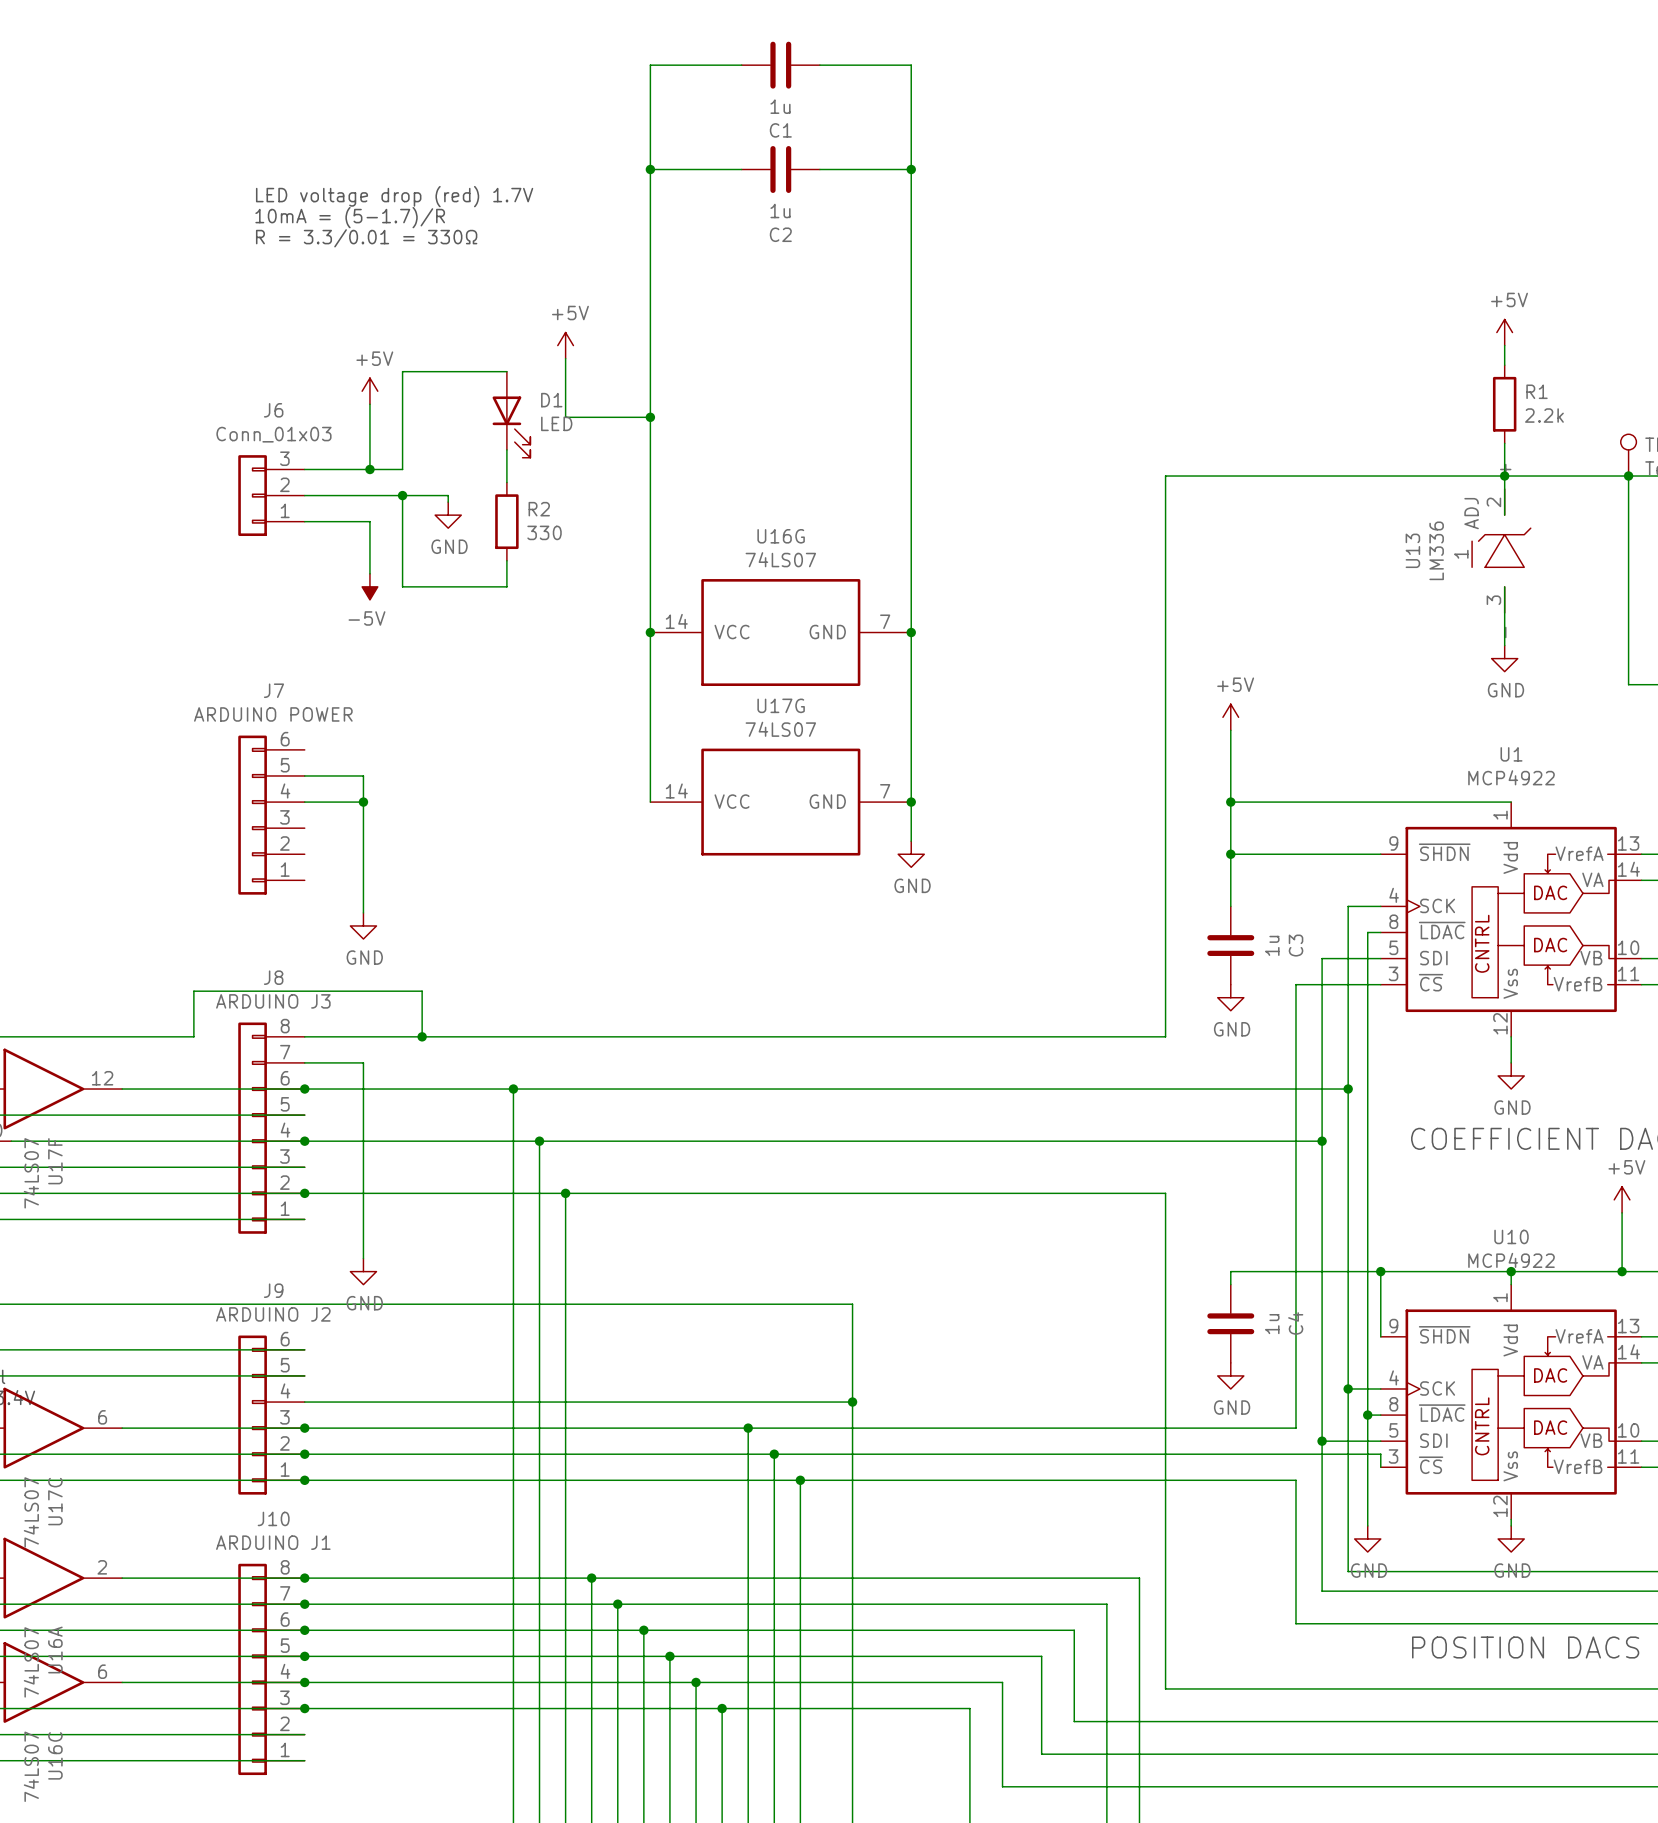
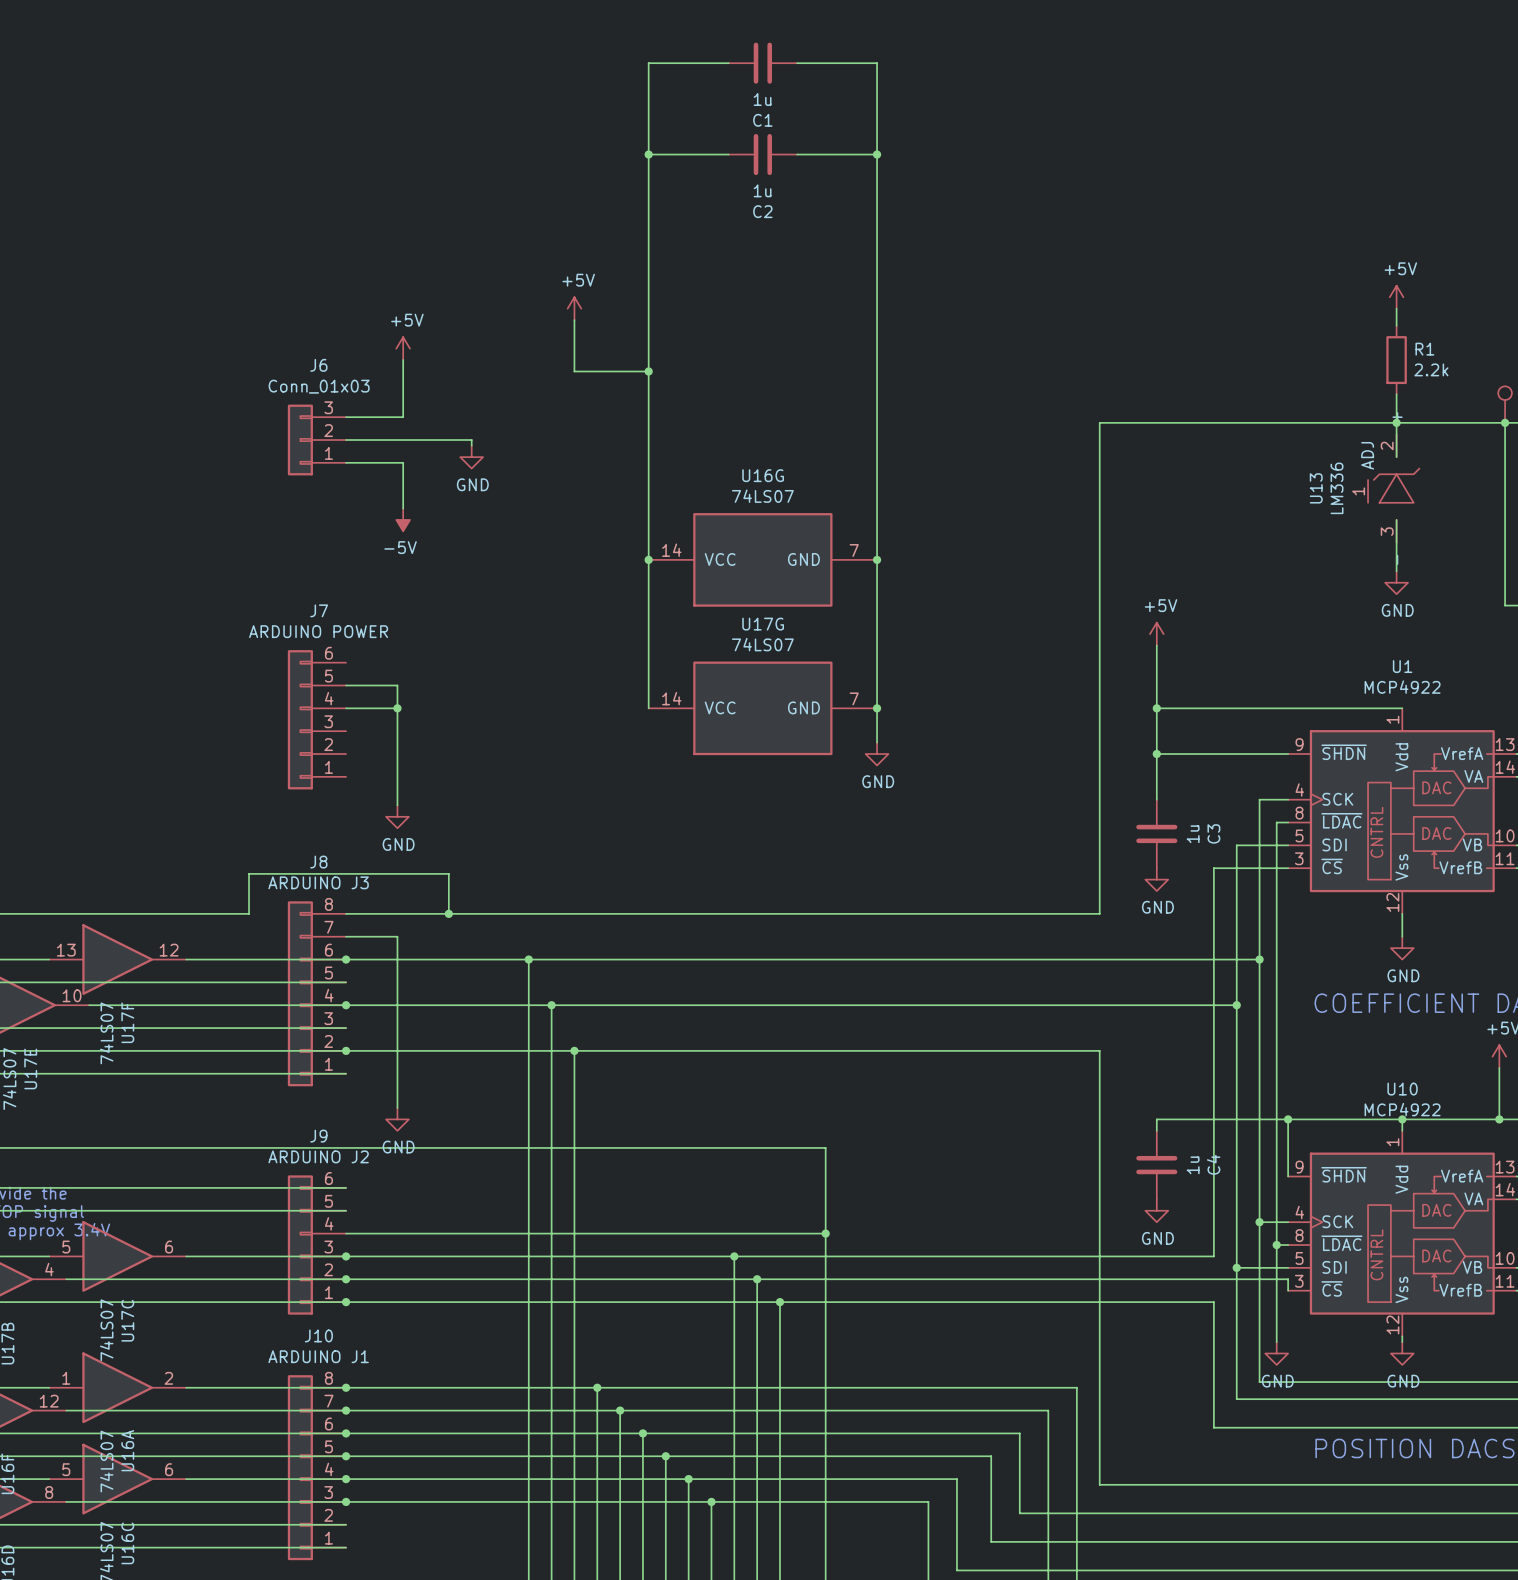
text: LED voltage drop (red) 1.7V (394, 196) -> none
text: 10mA = (5-1.7)/R (350, 217) -> none
text: R = 3.3/0.01 = 330Ω (366, 238) -> none
wire: (506, 371) (402, 371) (402, 469) (369, 469) -> none
D1: LED (511, 414) -> none
wire: (506, 449) (506, 482) -> none
junction: (369, 469) -> none
wire: (402, 495) (402, 586) (506, 586) (506, 560) -> none
junction: (402, 495) -> none
R2: 330 (506, 521) -> none

